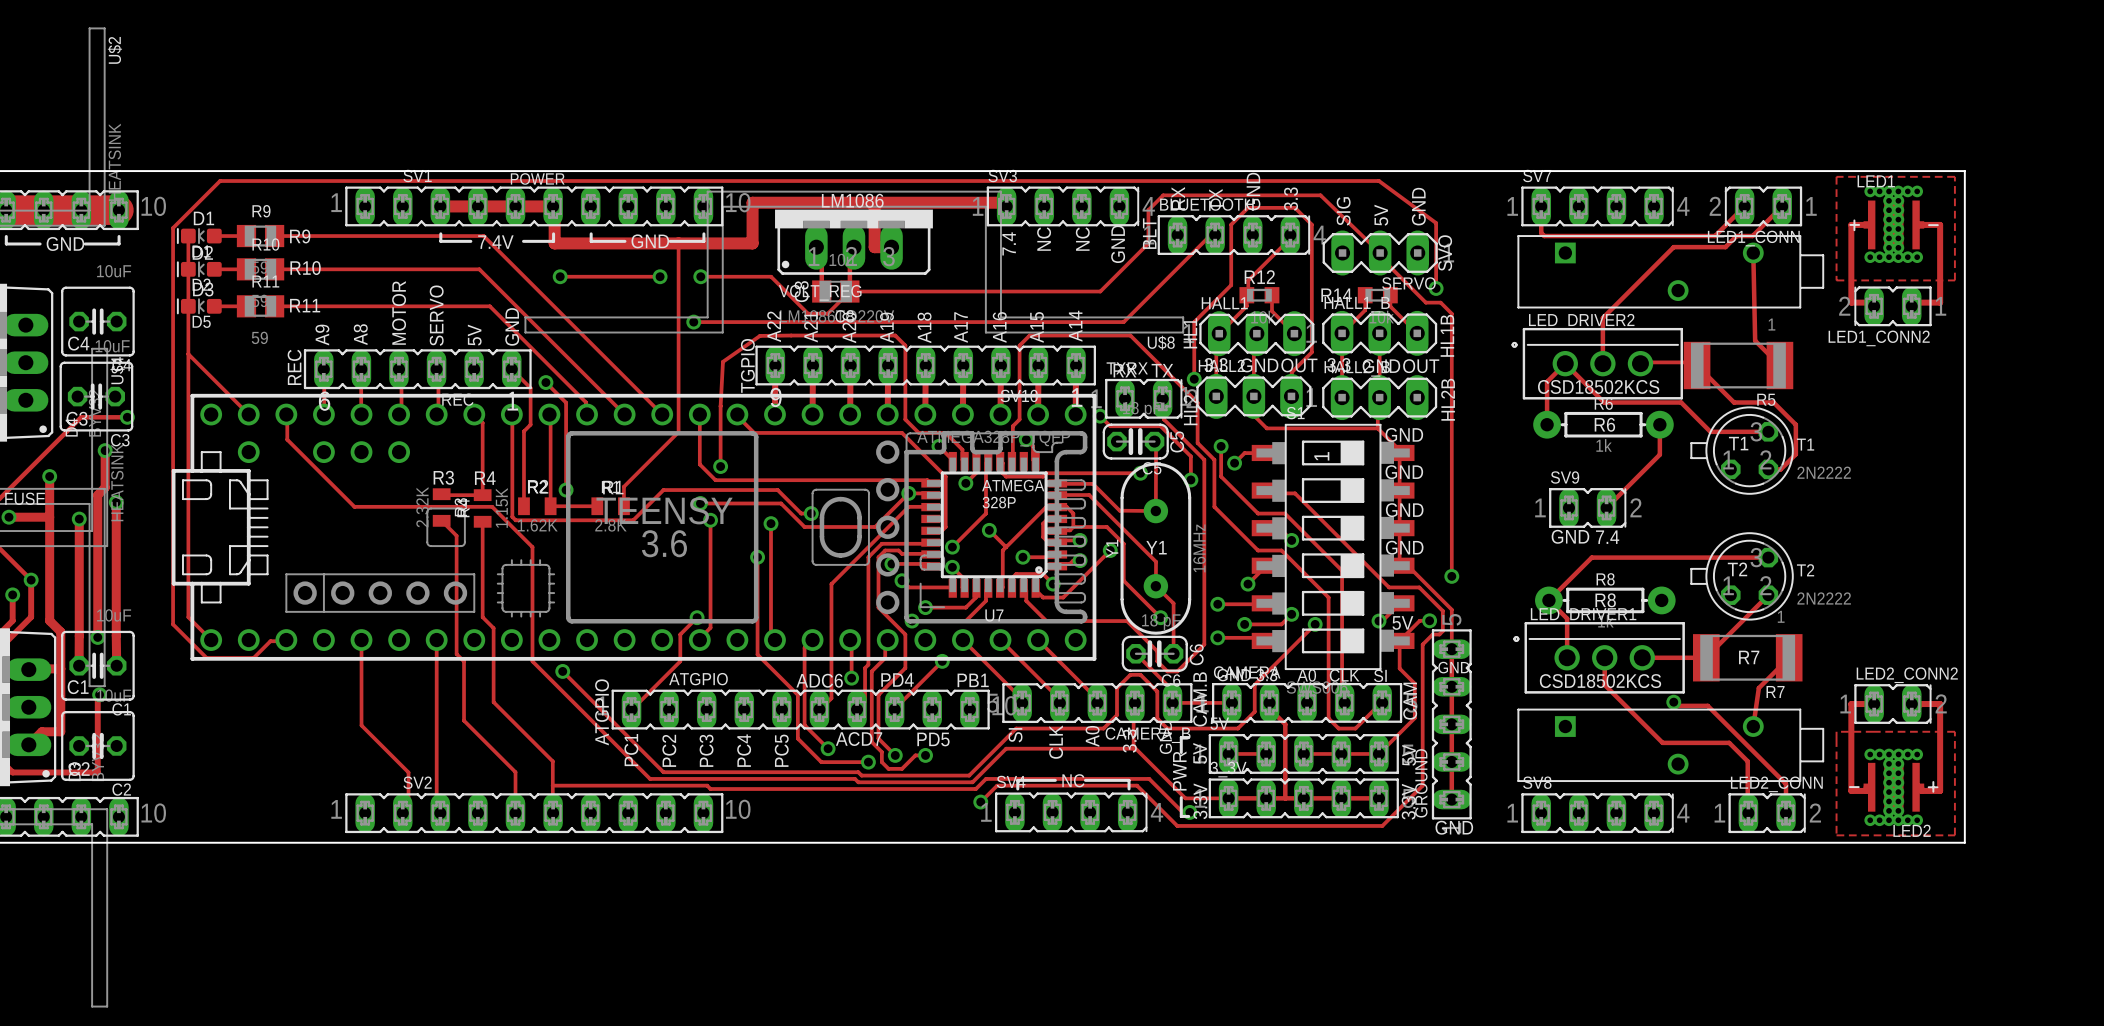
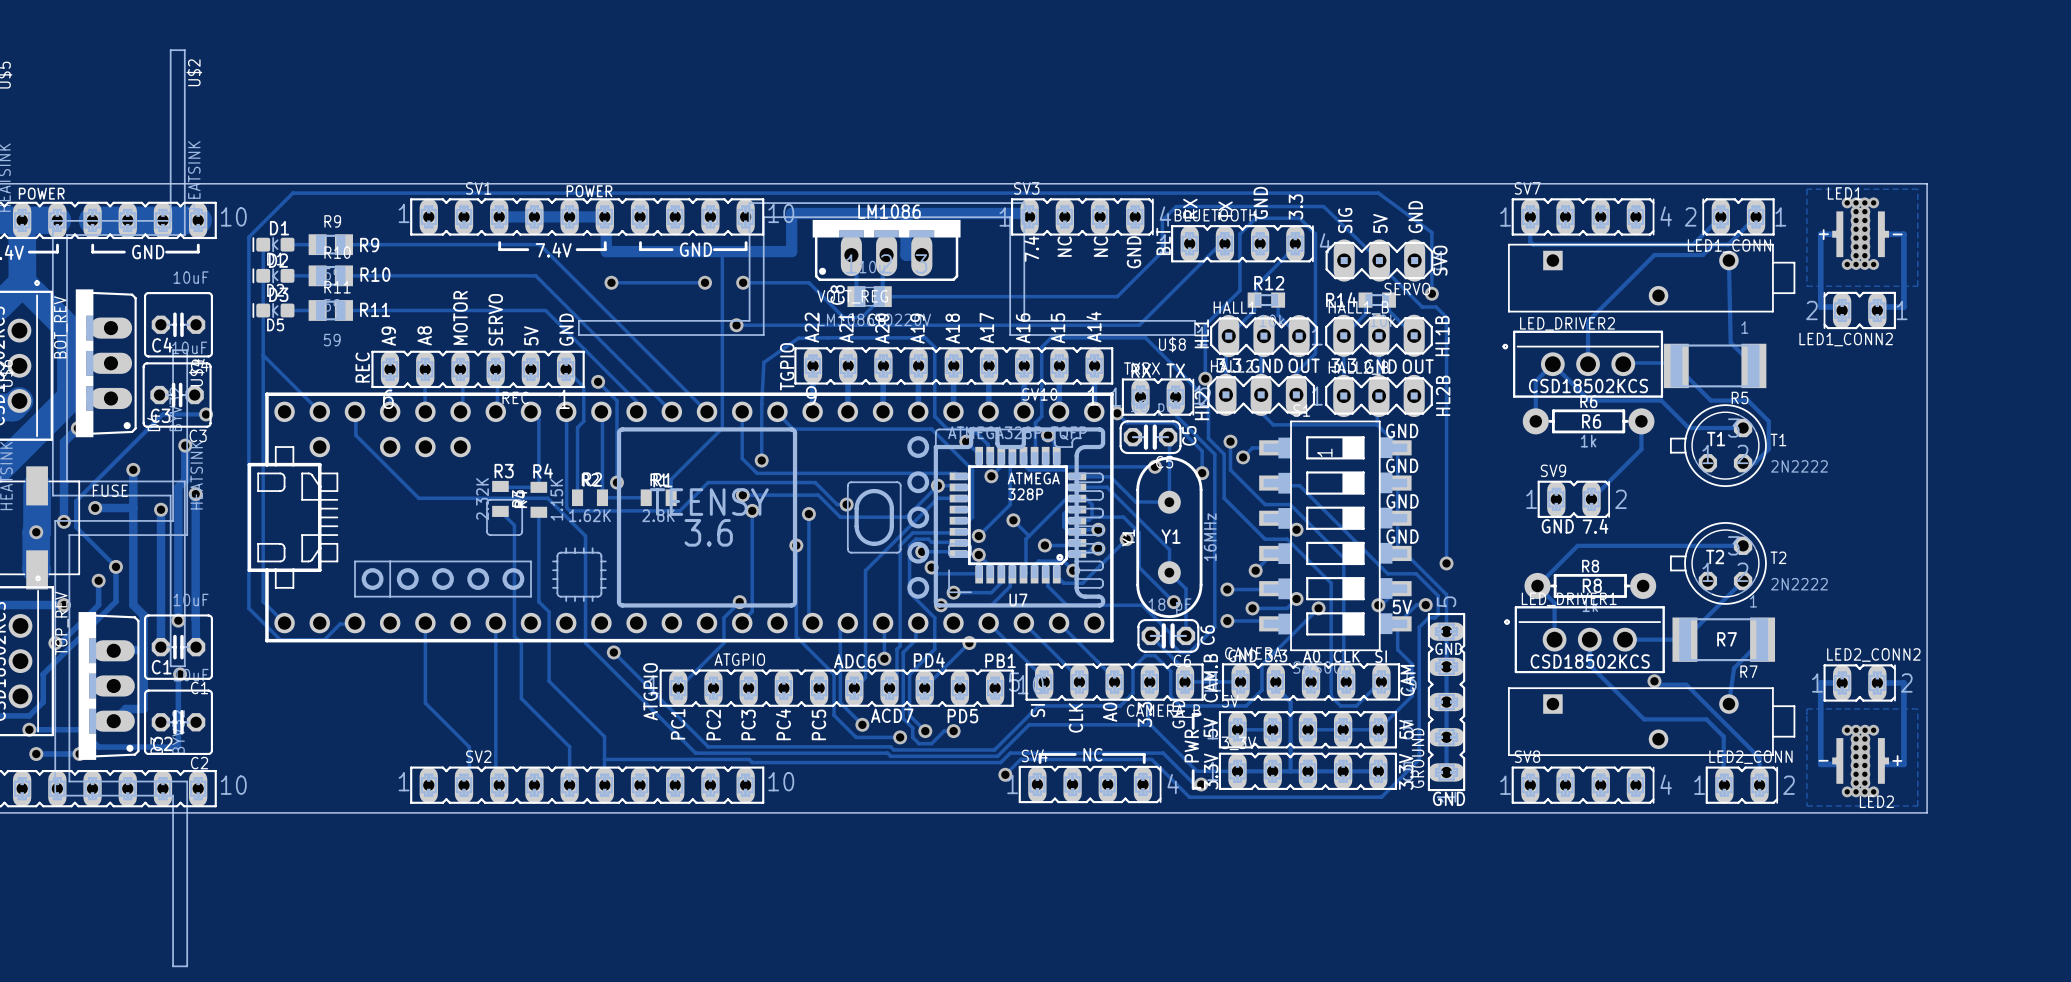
via: (1870, 191) -> none
via: (1917, 191) -> none
via: (1870, 257) -> none
via: (1917, 257) -> none
via: (1870, 754) -> none
via: (1917, 754) -> none
via: (1870, 820) -> none
via: (1917, 820) -> none

